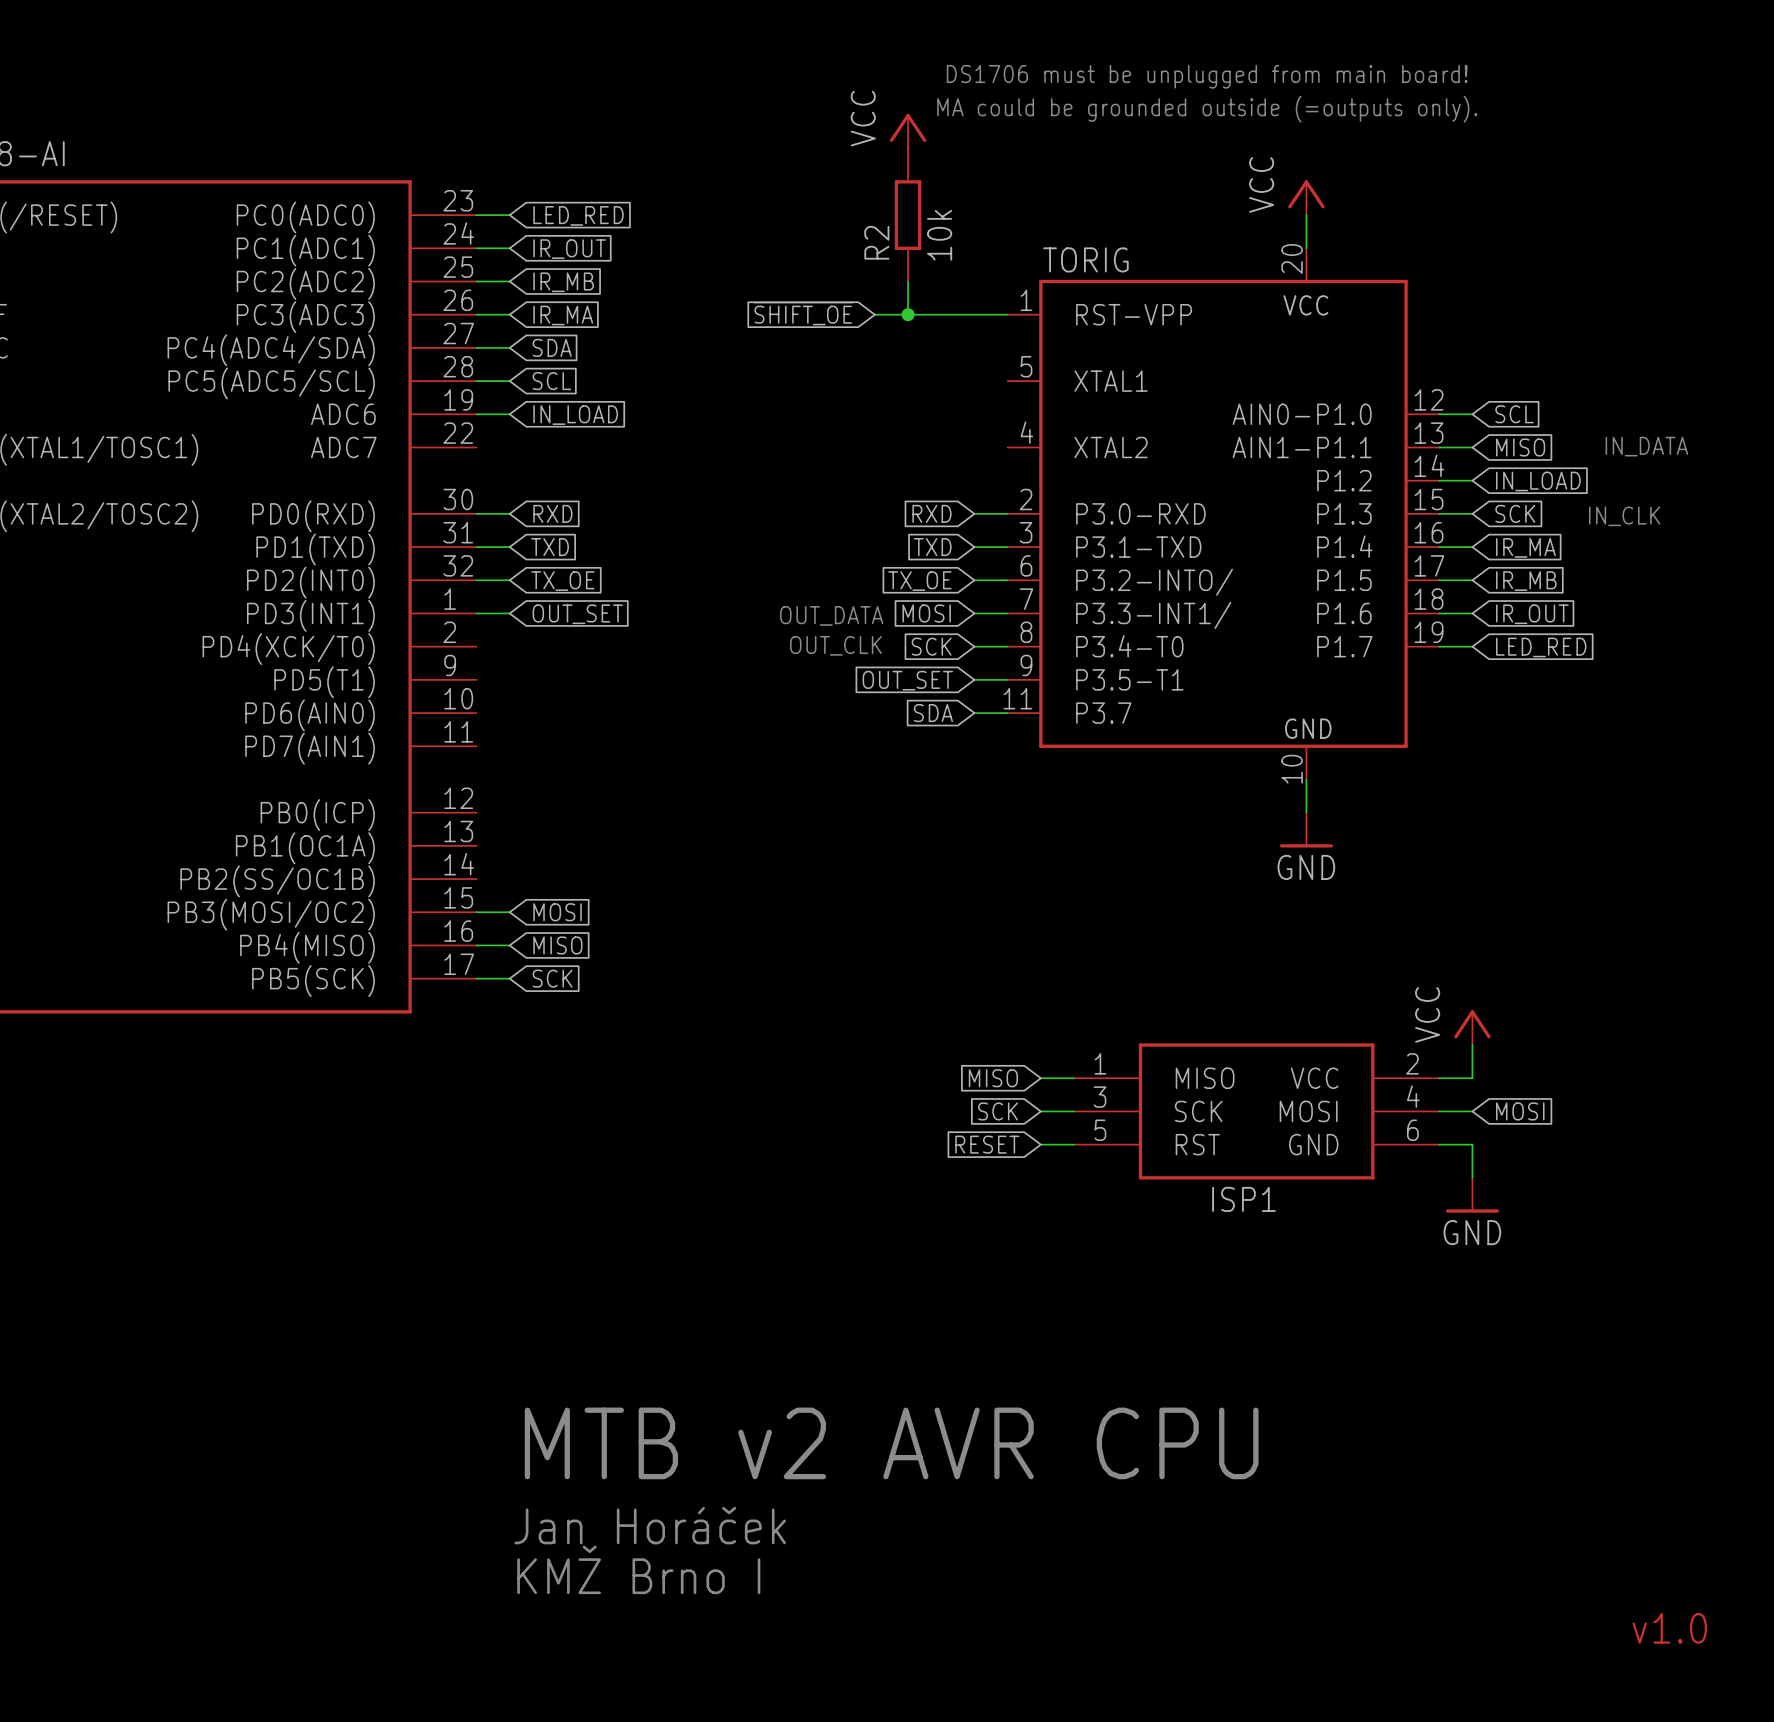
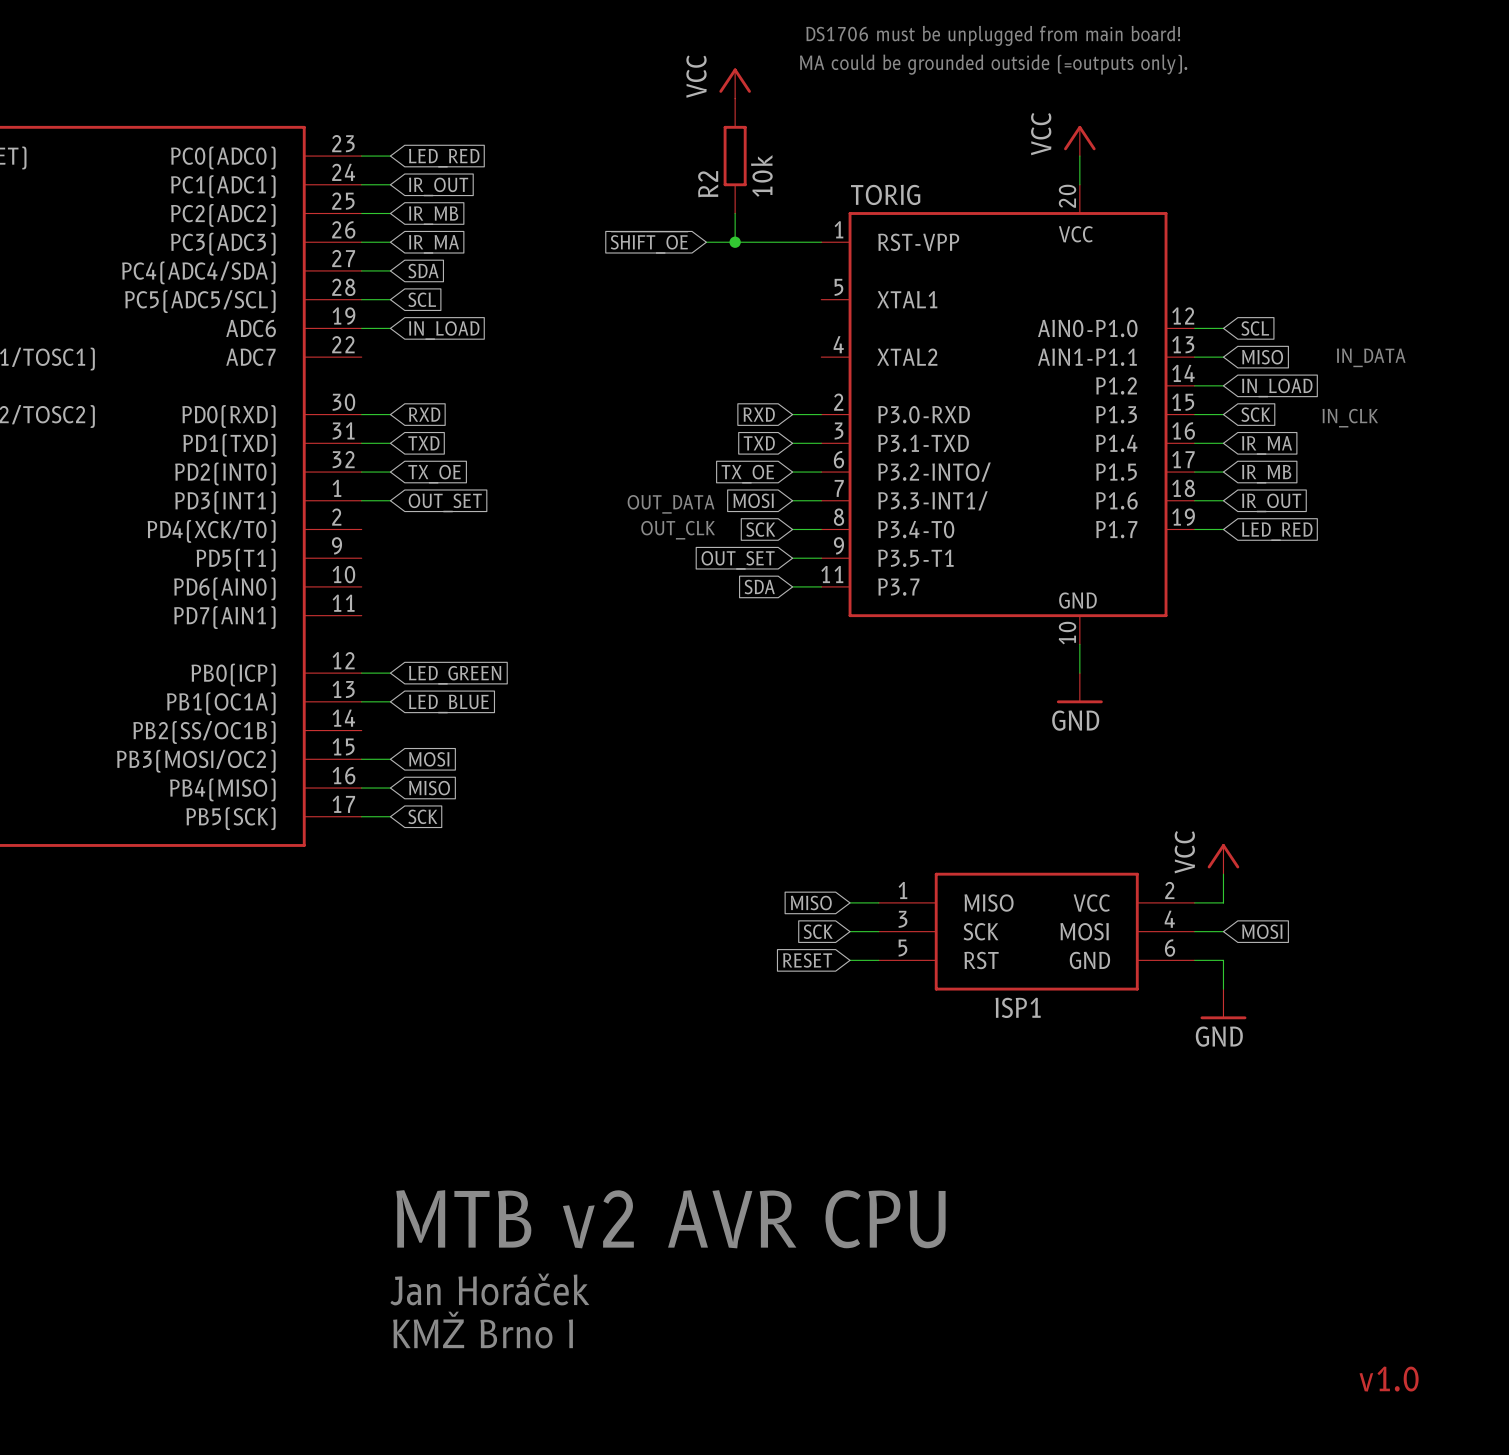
wire: none -> (361, 673) (390, 673)
global label: none -> LED_GREEN (455, 675)
wire: none -> (361, 701) (390, 701)
global label: none -> LED_BLUE (448, 703)

